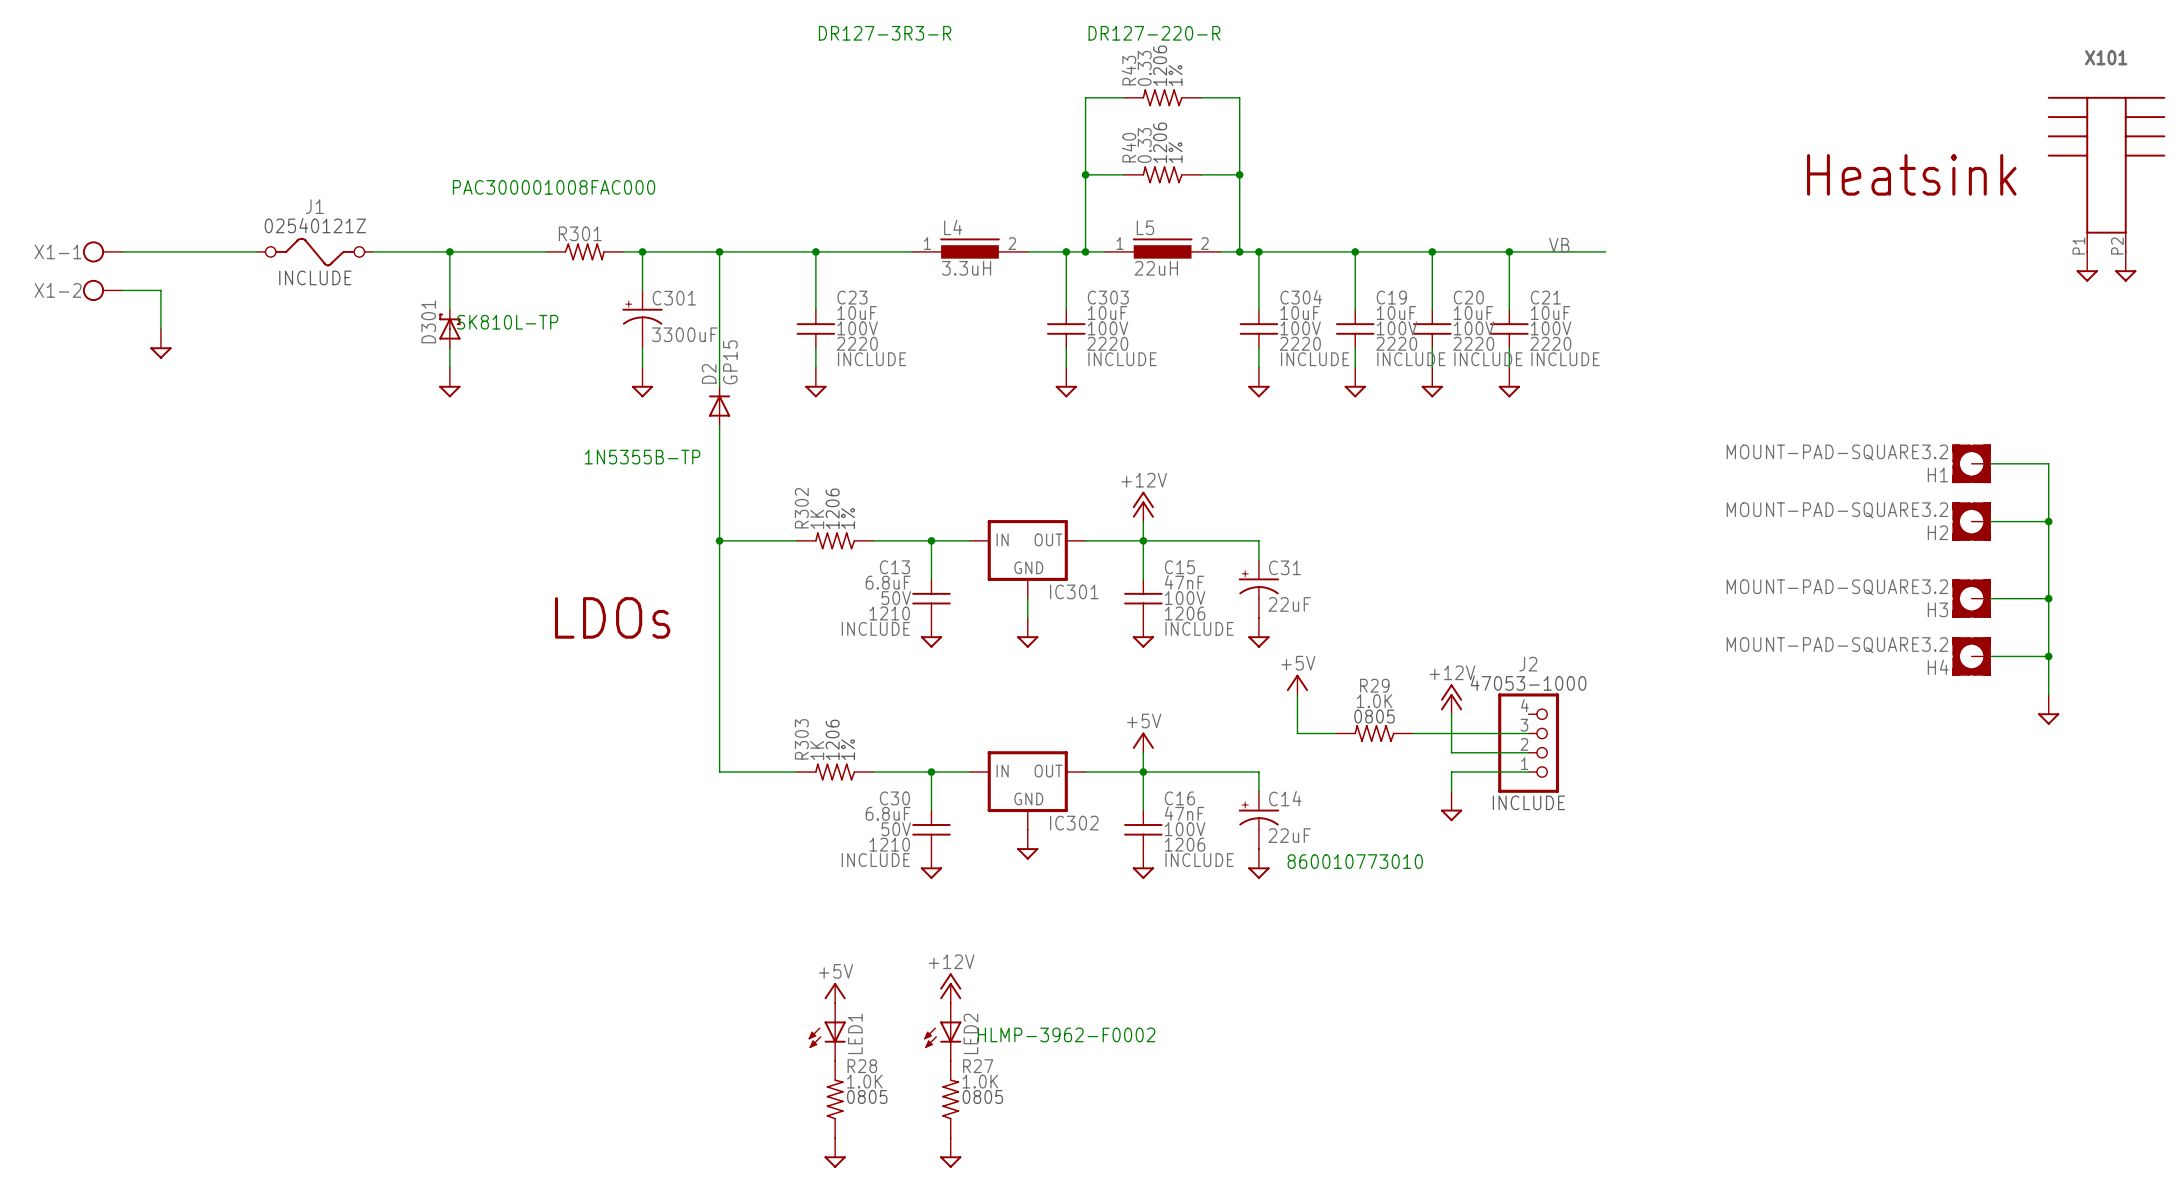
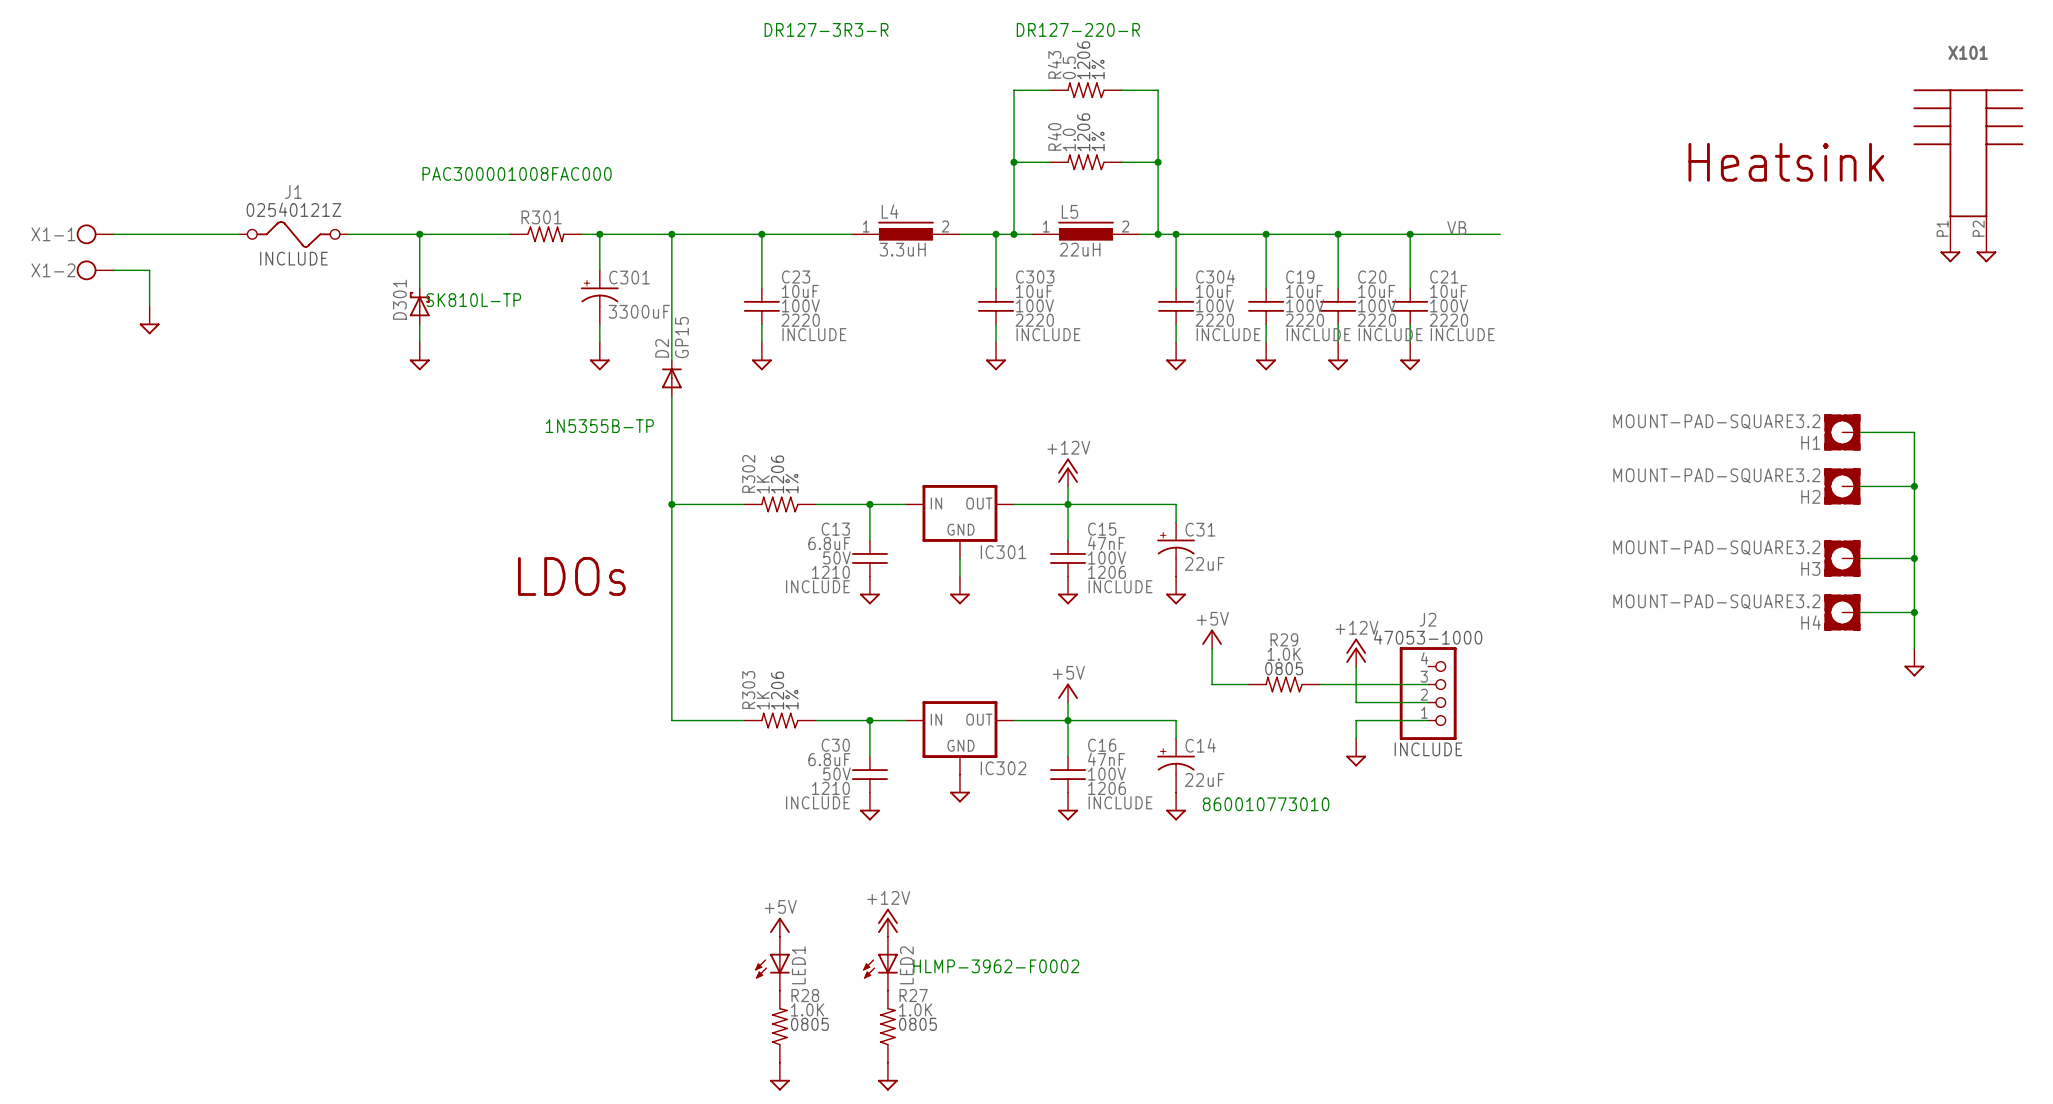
R43 value: 0.33 (1144, 68) -> 0.5 (1069, 67)
R40 value: 0.33 (1144, 145) -> 1.0 (1069, 139)

